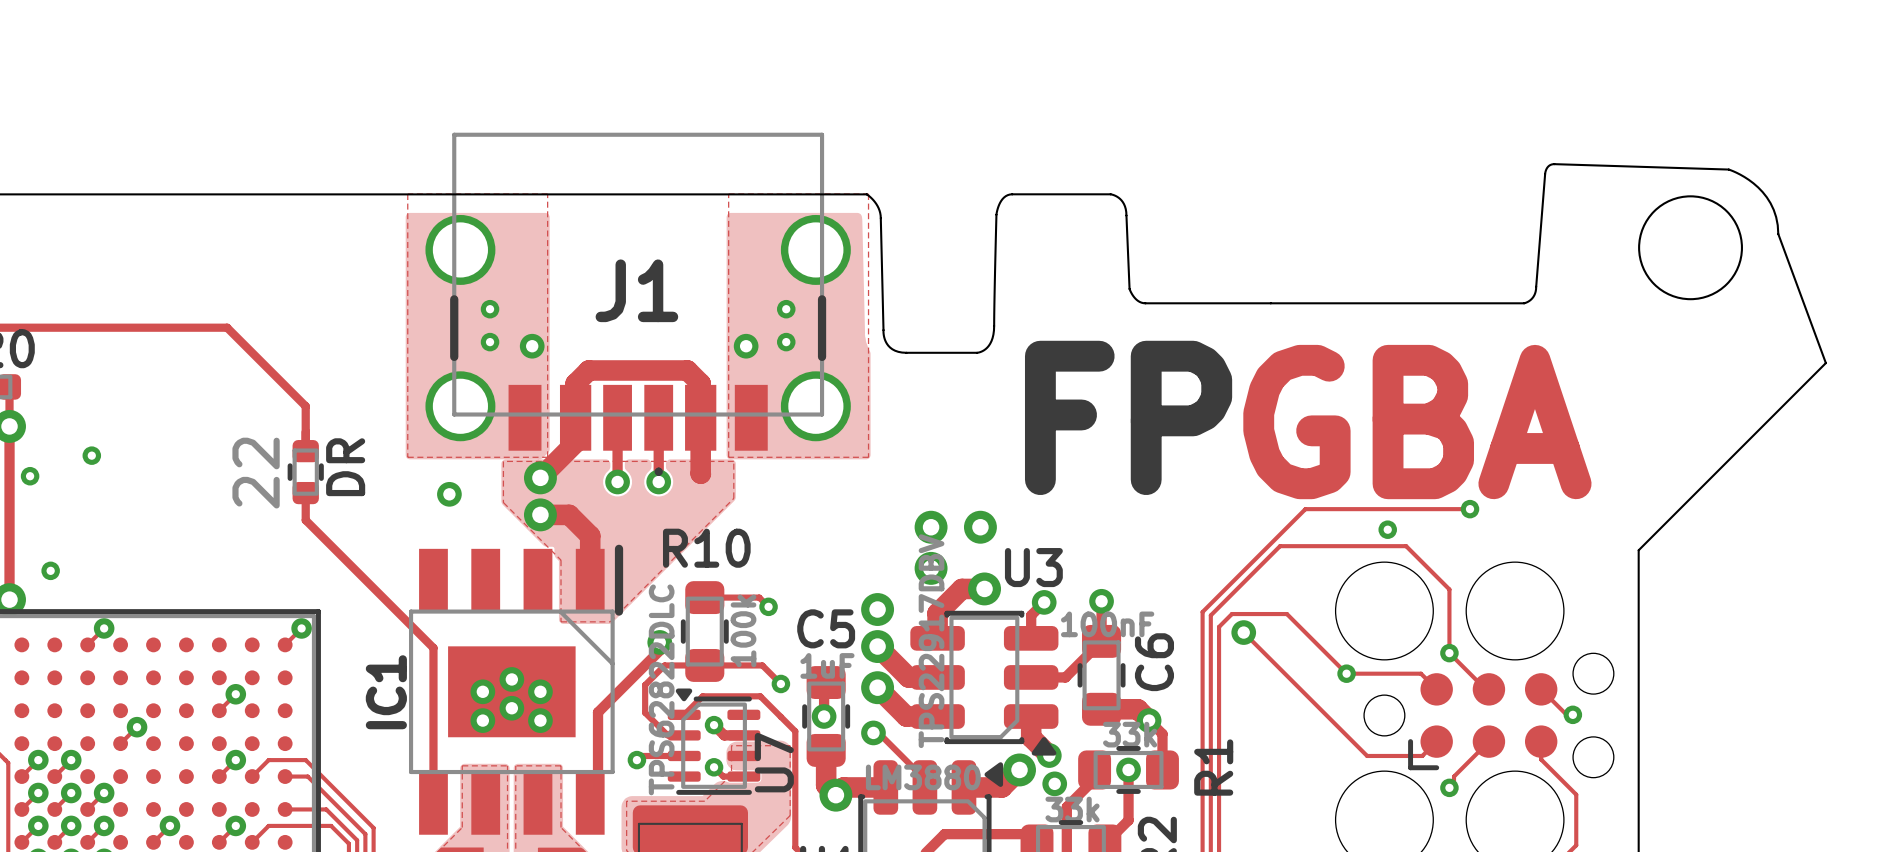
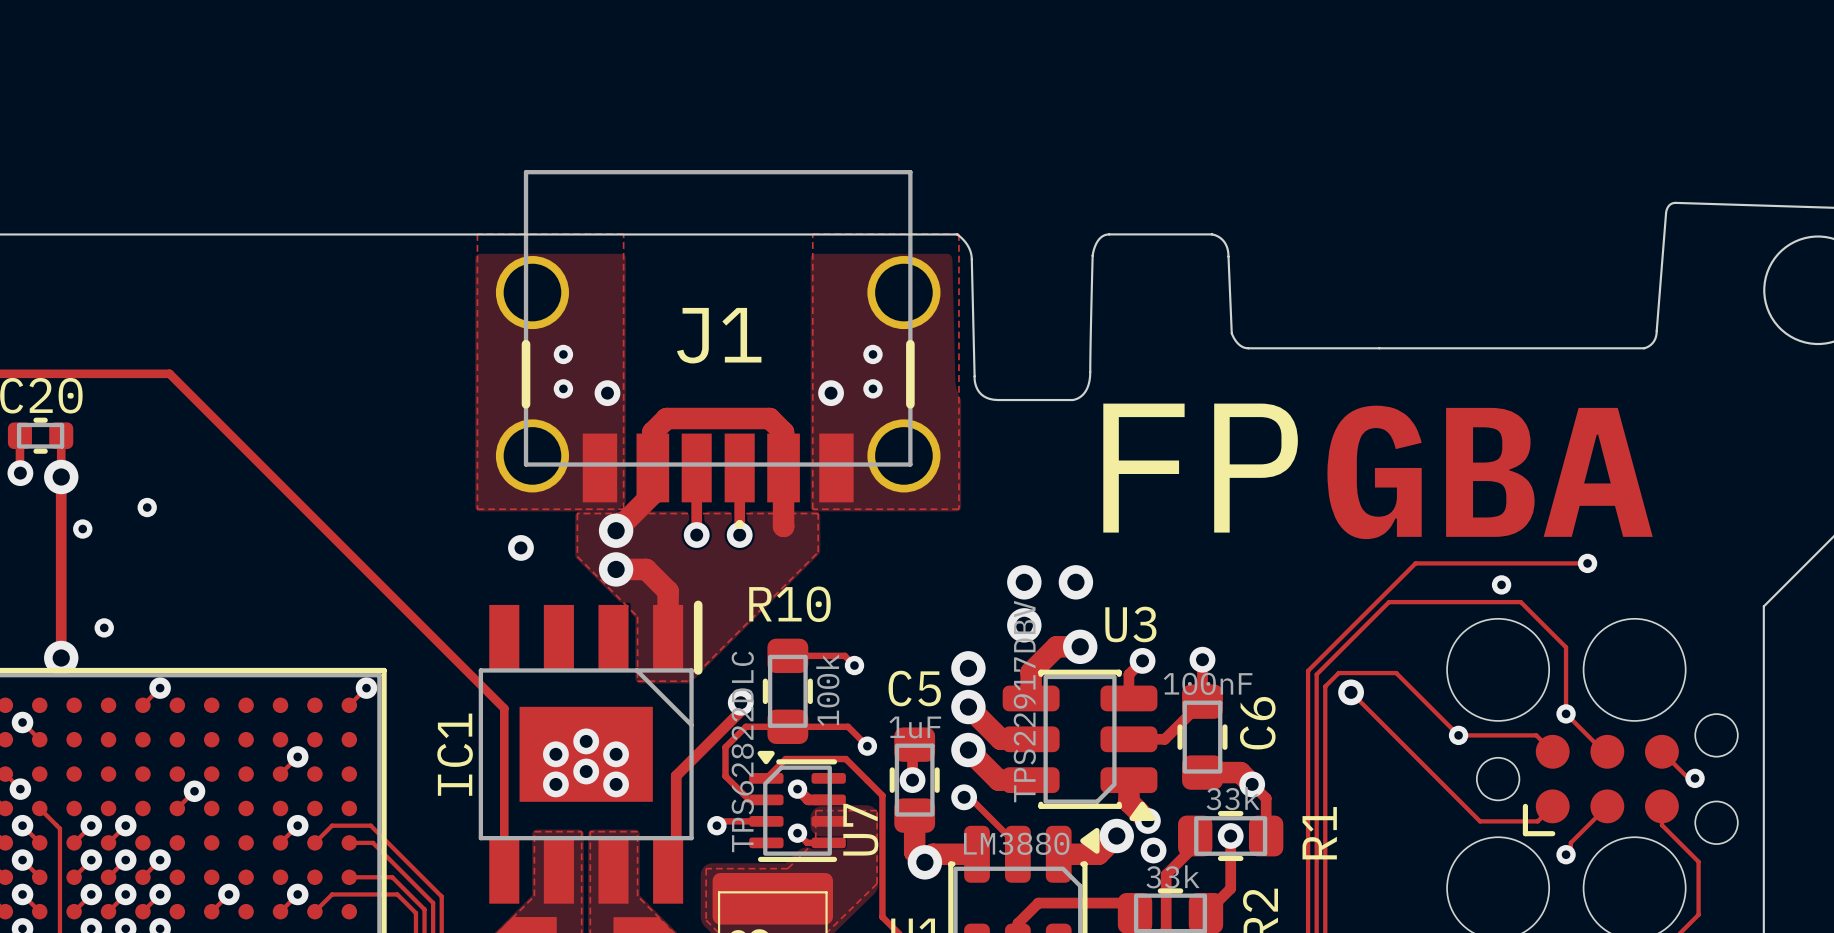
track: (113, 327) (227, 327) (305, 406) (305, 451) -> (169, 373) (370, 575)
DR: 22 (305, 472) -> none
track: (305, 493) (305, 520) -> none

